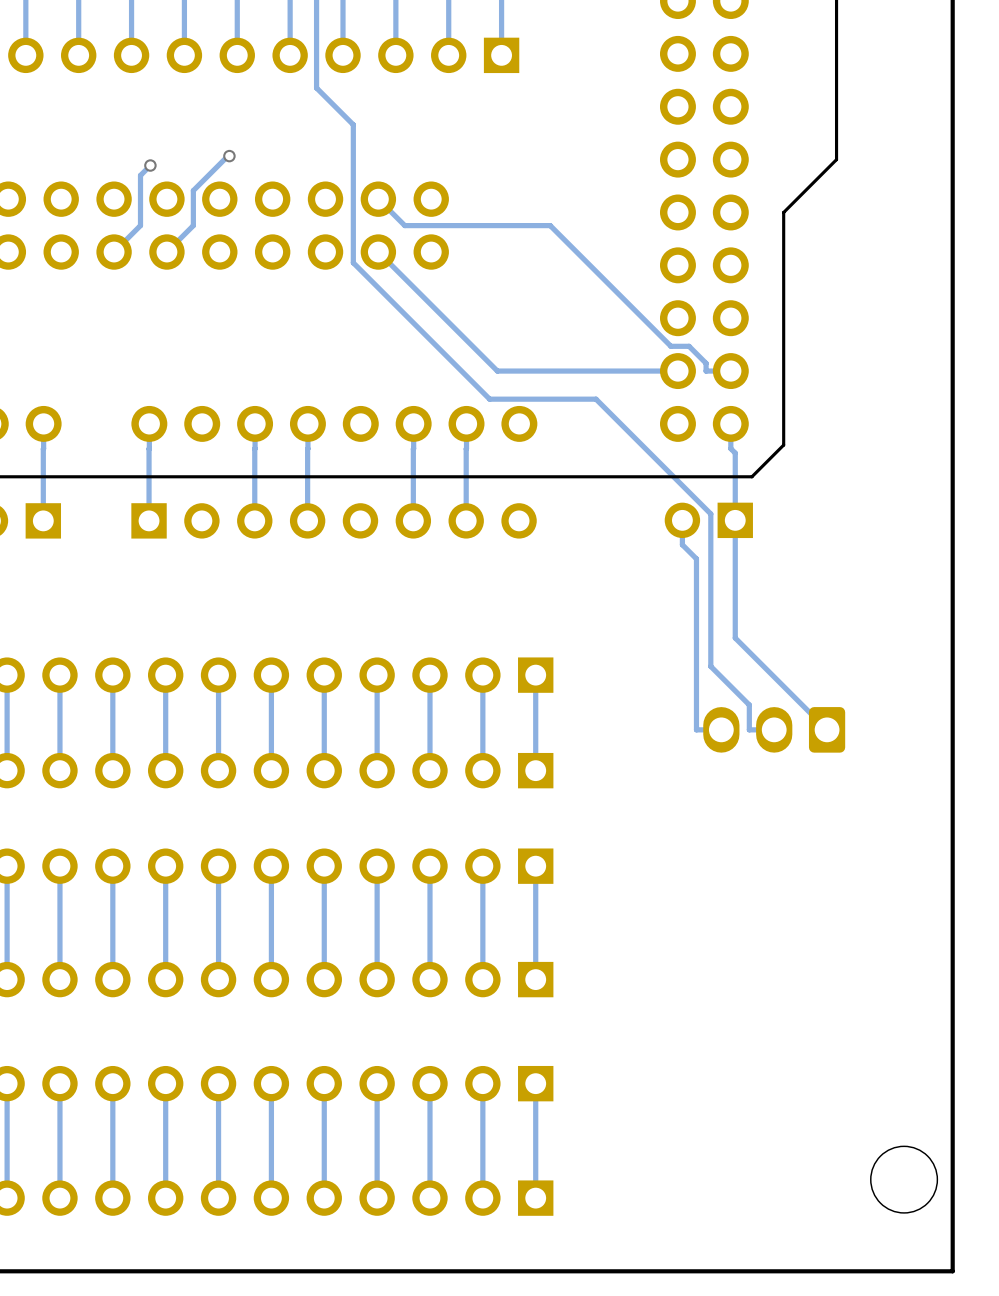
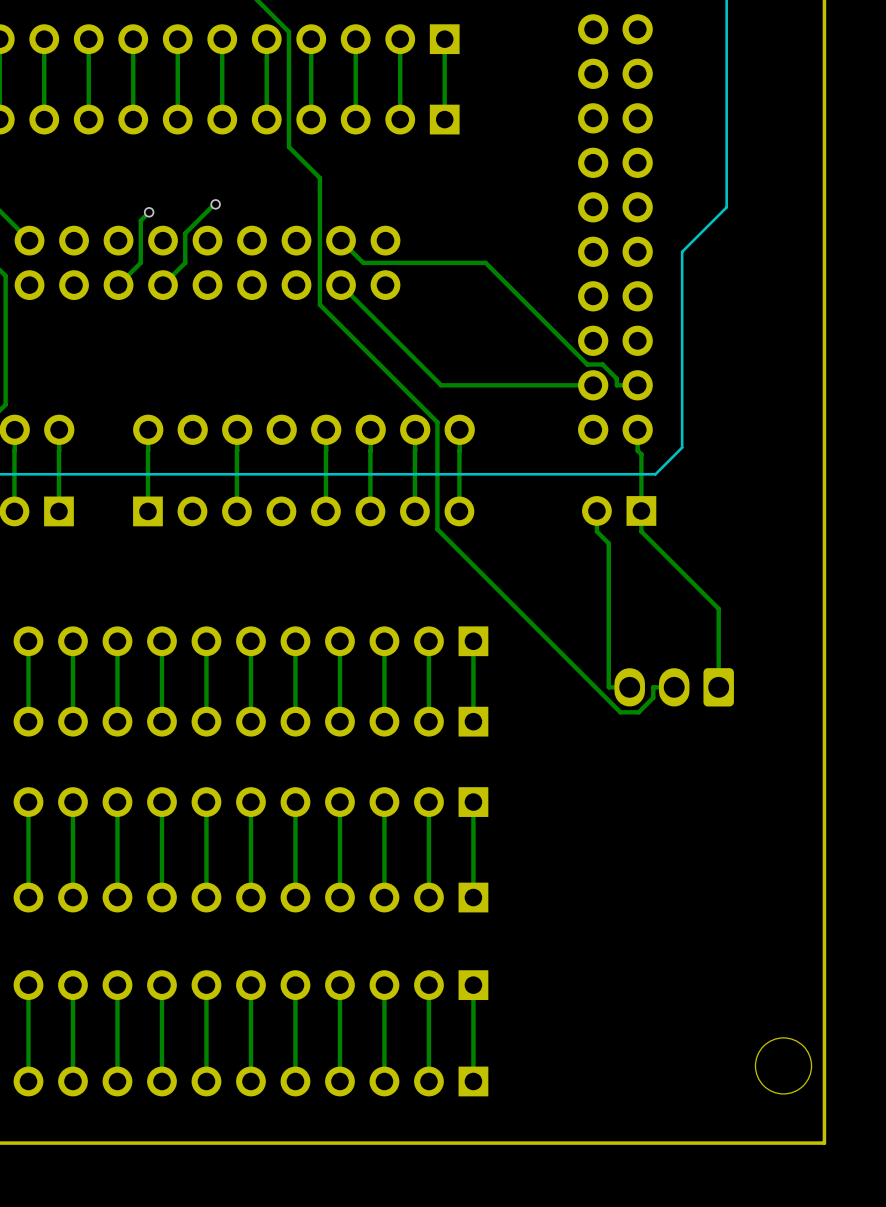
track: (353, 262) (489, 399) (596, 399) (710, 513) (710, 666) (749, 704) (749, 729) -> (319, 294) (319, 304) (437, 422) (437, 529) (620, 712) (638, 712) (653, 697) (653, 687)
track: (307, 423) (307, 520) -> (326, 429) (325, 511)
track: none -> (459, 429) (459, 511)
track: (735, 544) (735, 638) (827, 729) -> (641, 531) (718, 608) (718, 687)

